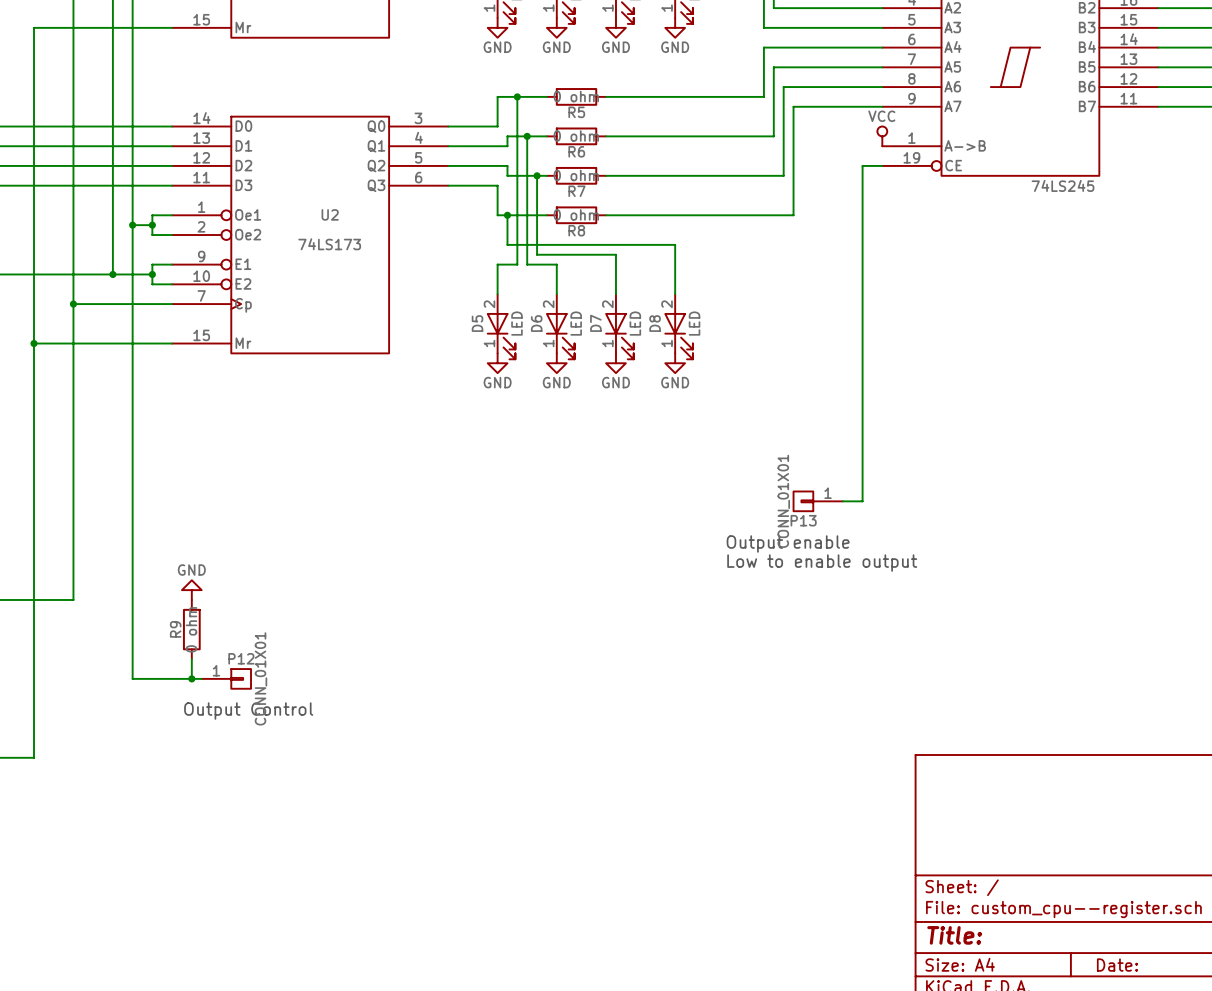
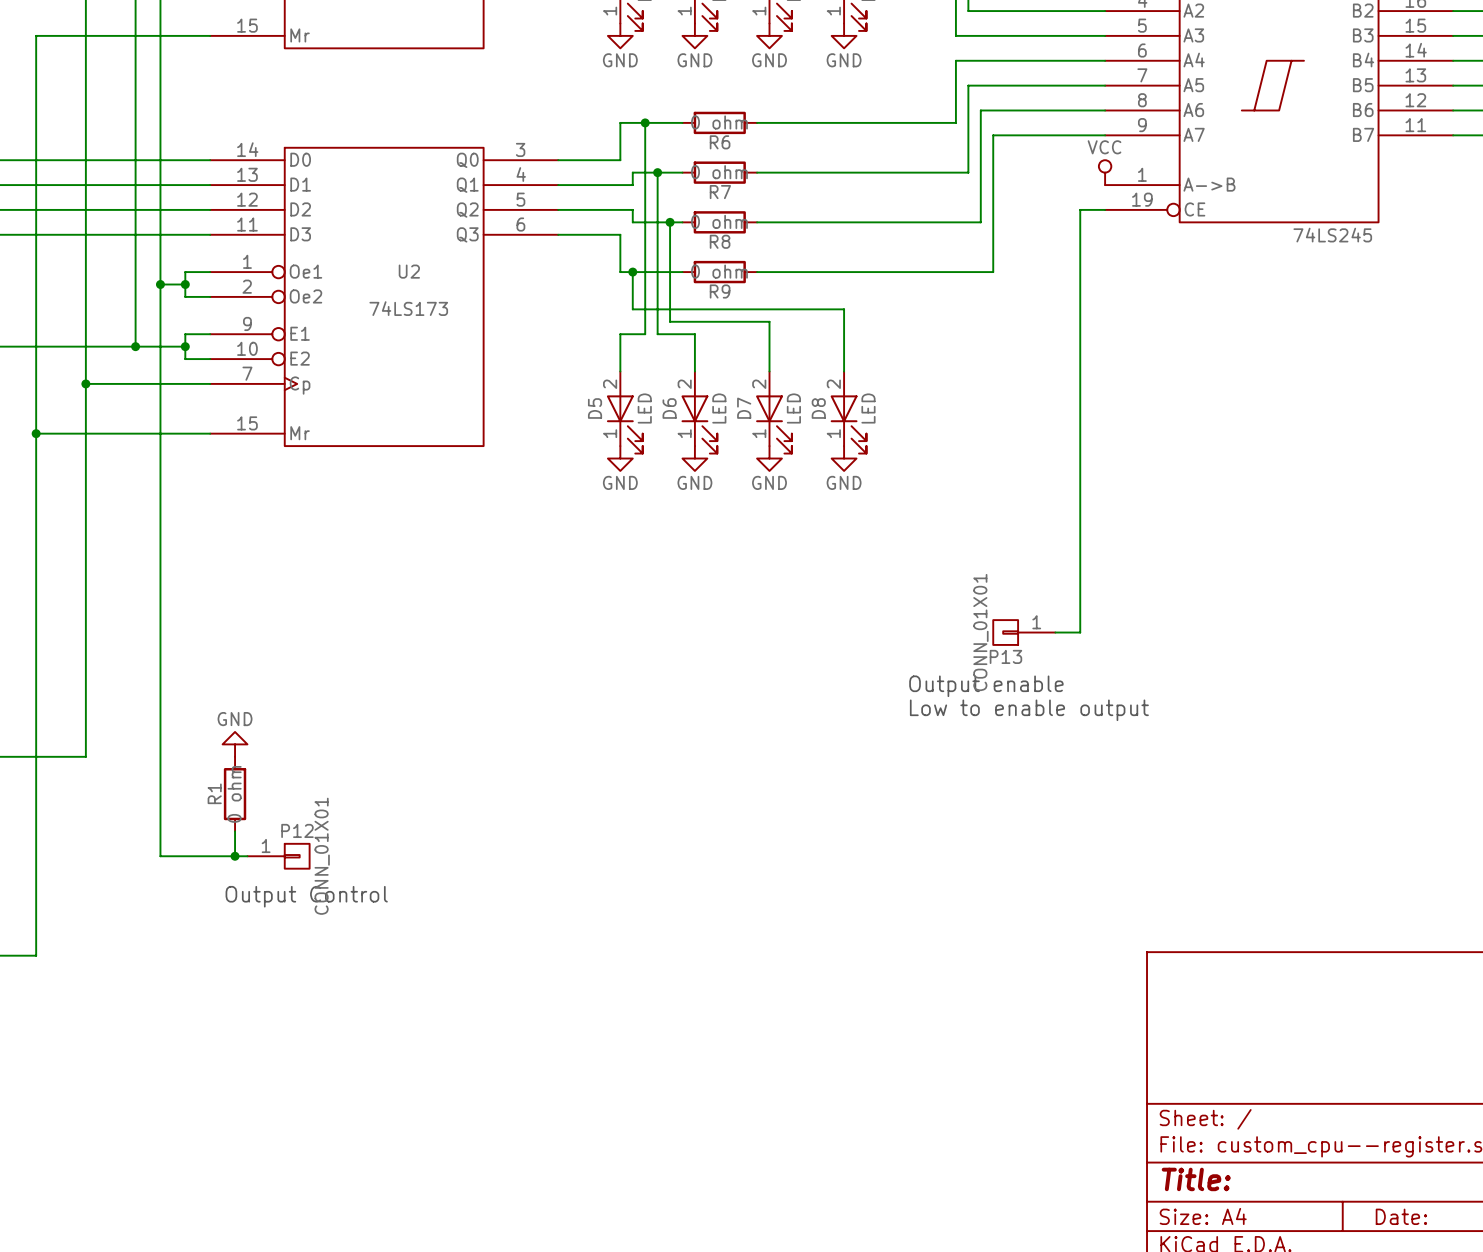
R5 name: R5 (576, 112) -> R6 (720, 142)
R6 name: R6 (576, 151) -> R7 (720, 192)
R7 name: R7 (576, 191) -> R8 (720, 241)
R8 name: R8 (576, 230) -> R9 (720, 291)
R9 name: R9 (175, 629) -> R1 (214, 793)

